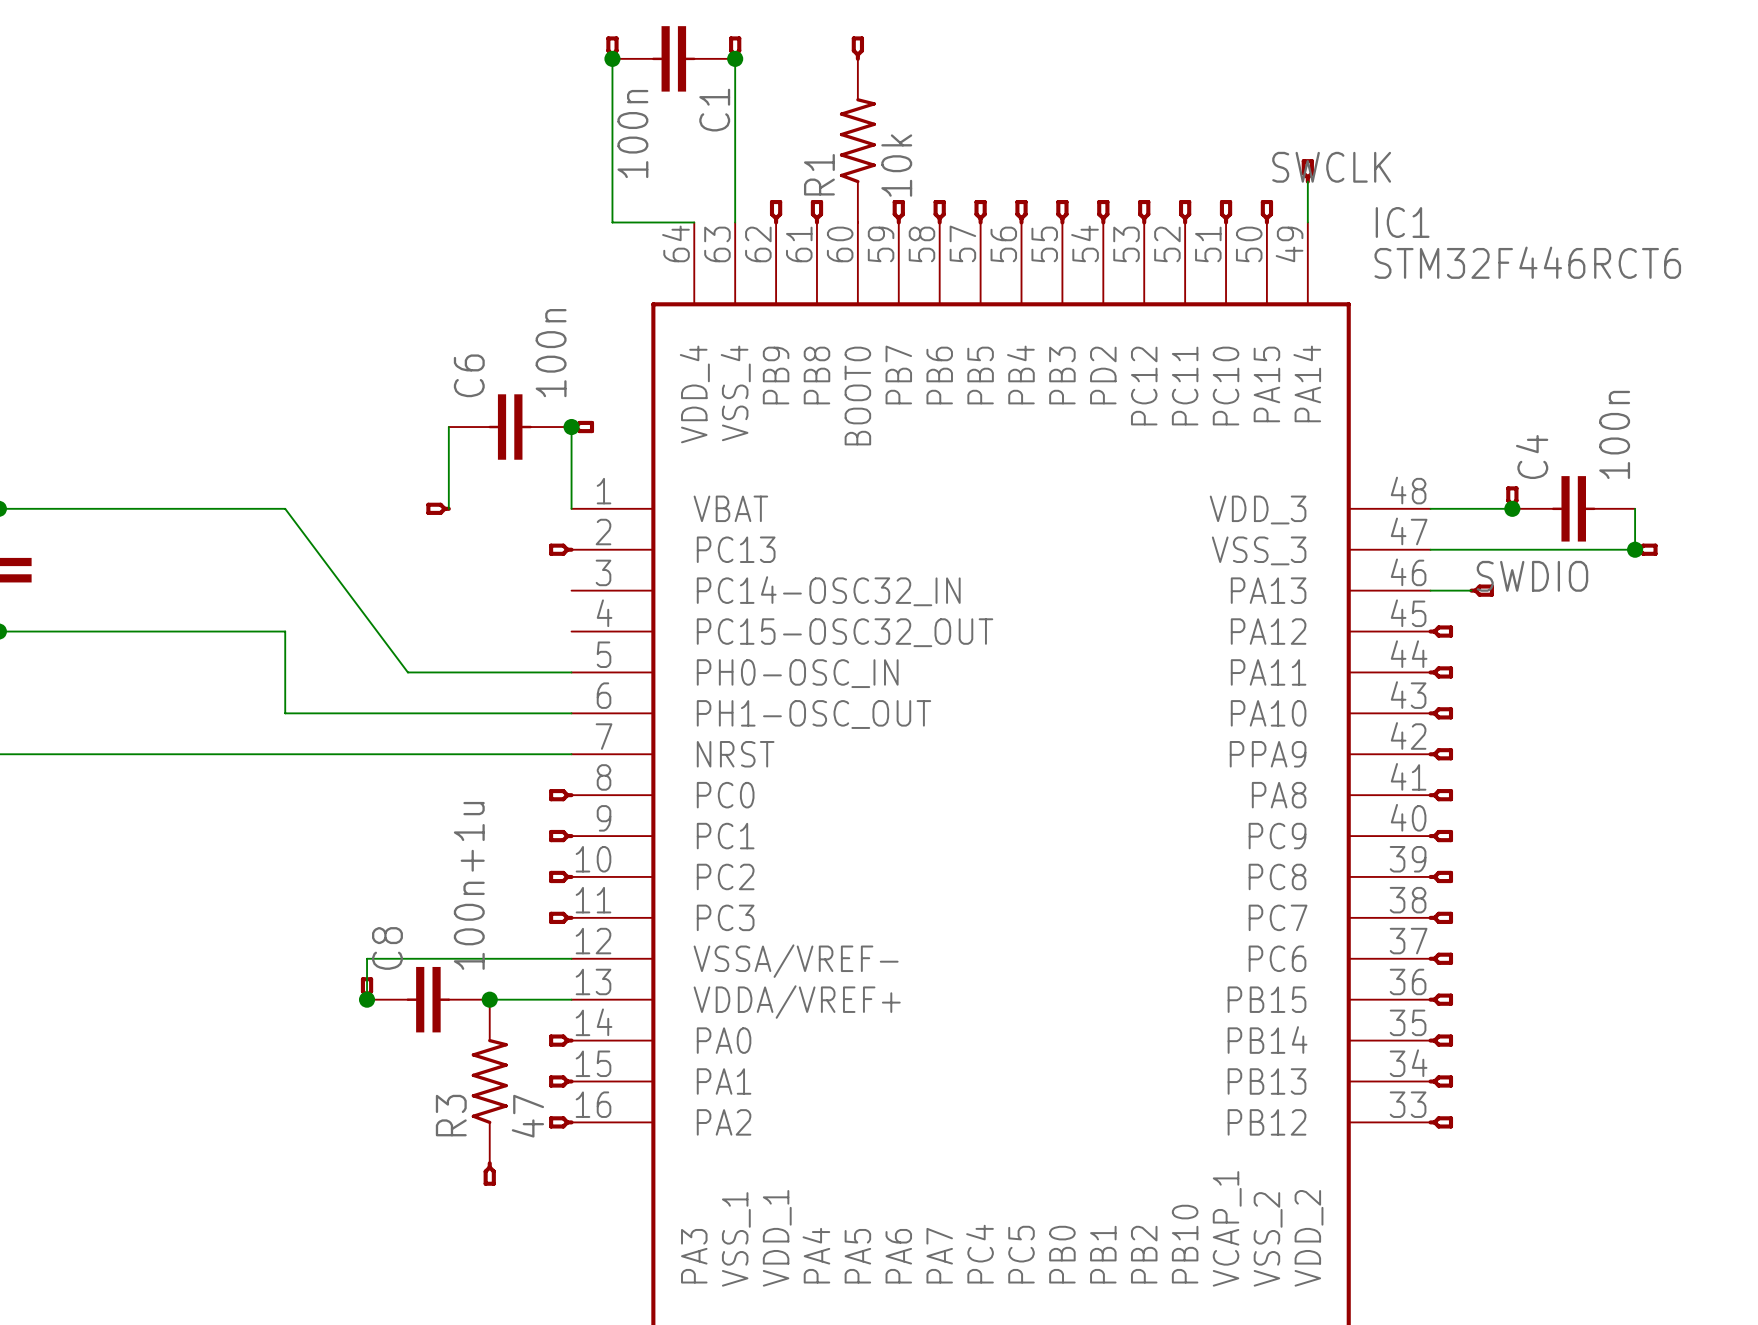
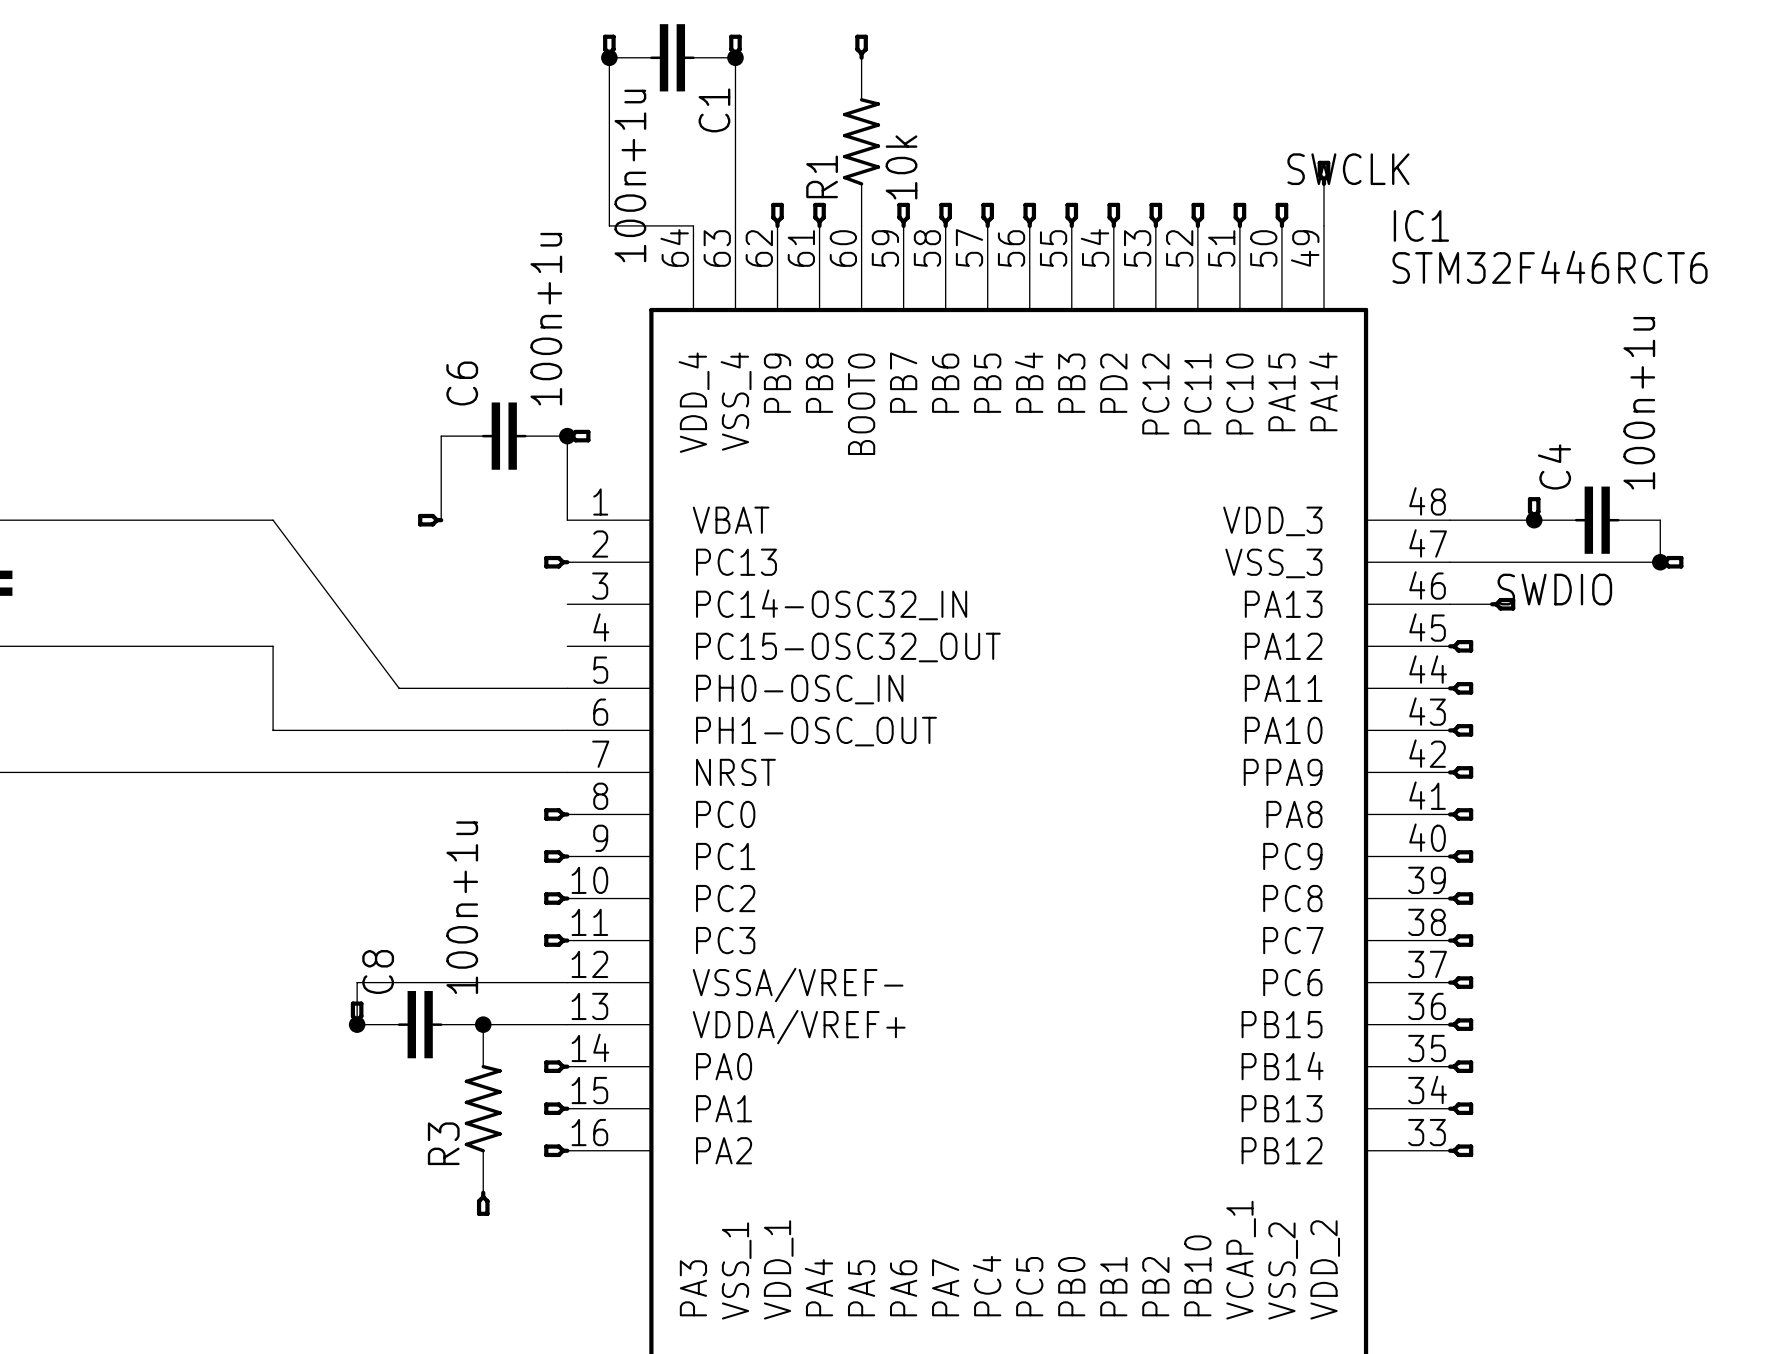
C1 value: 100n (632, 134) -> 100n+1u (630, 175)
C6 value: 100n (551, 353) -> 100n+1u (546, 319)
C4 value: 100n (1614, 434) -> 100n+1u (1639, 403)
R3 value: 47 (527, 1116) -> none

